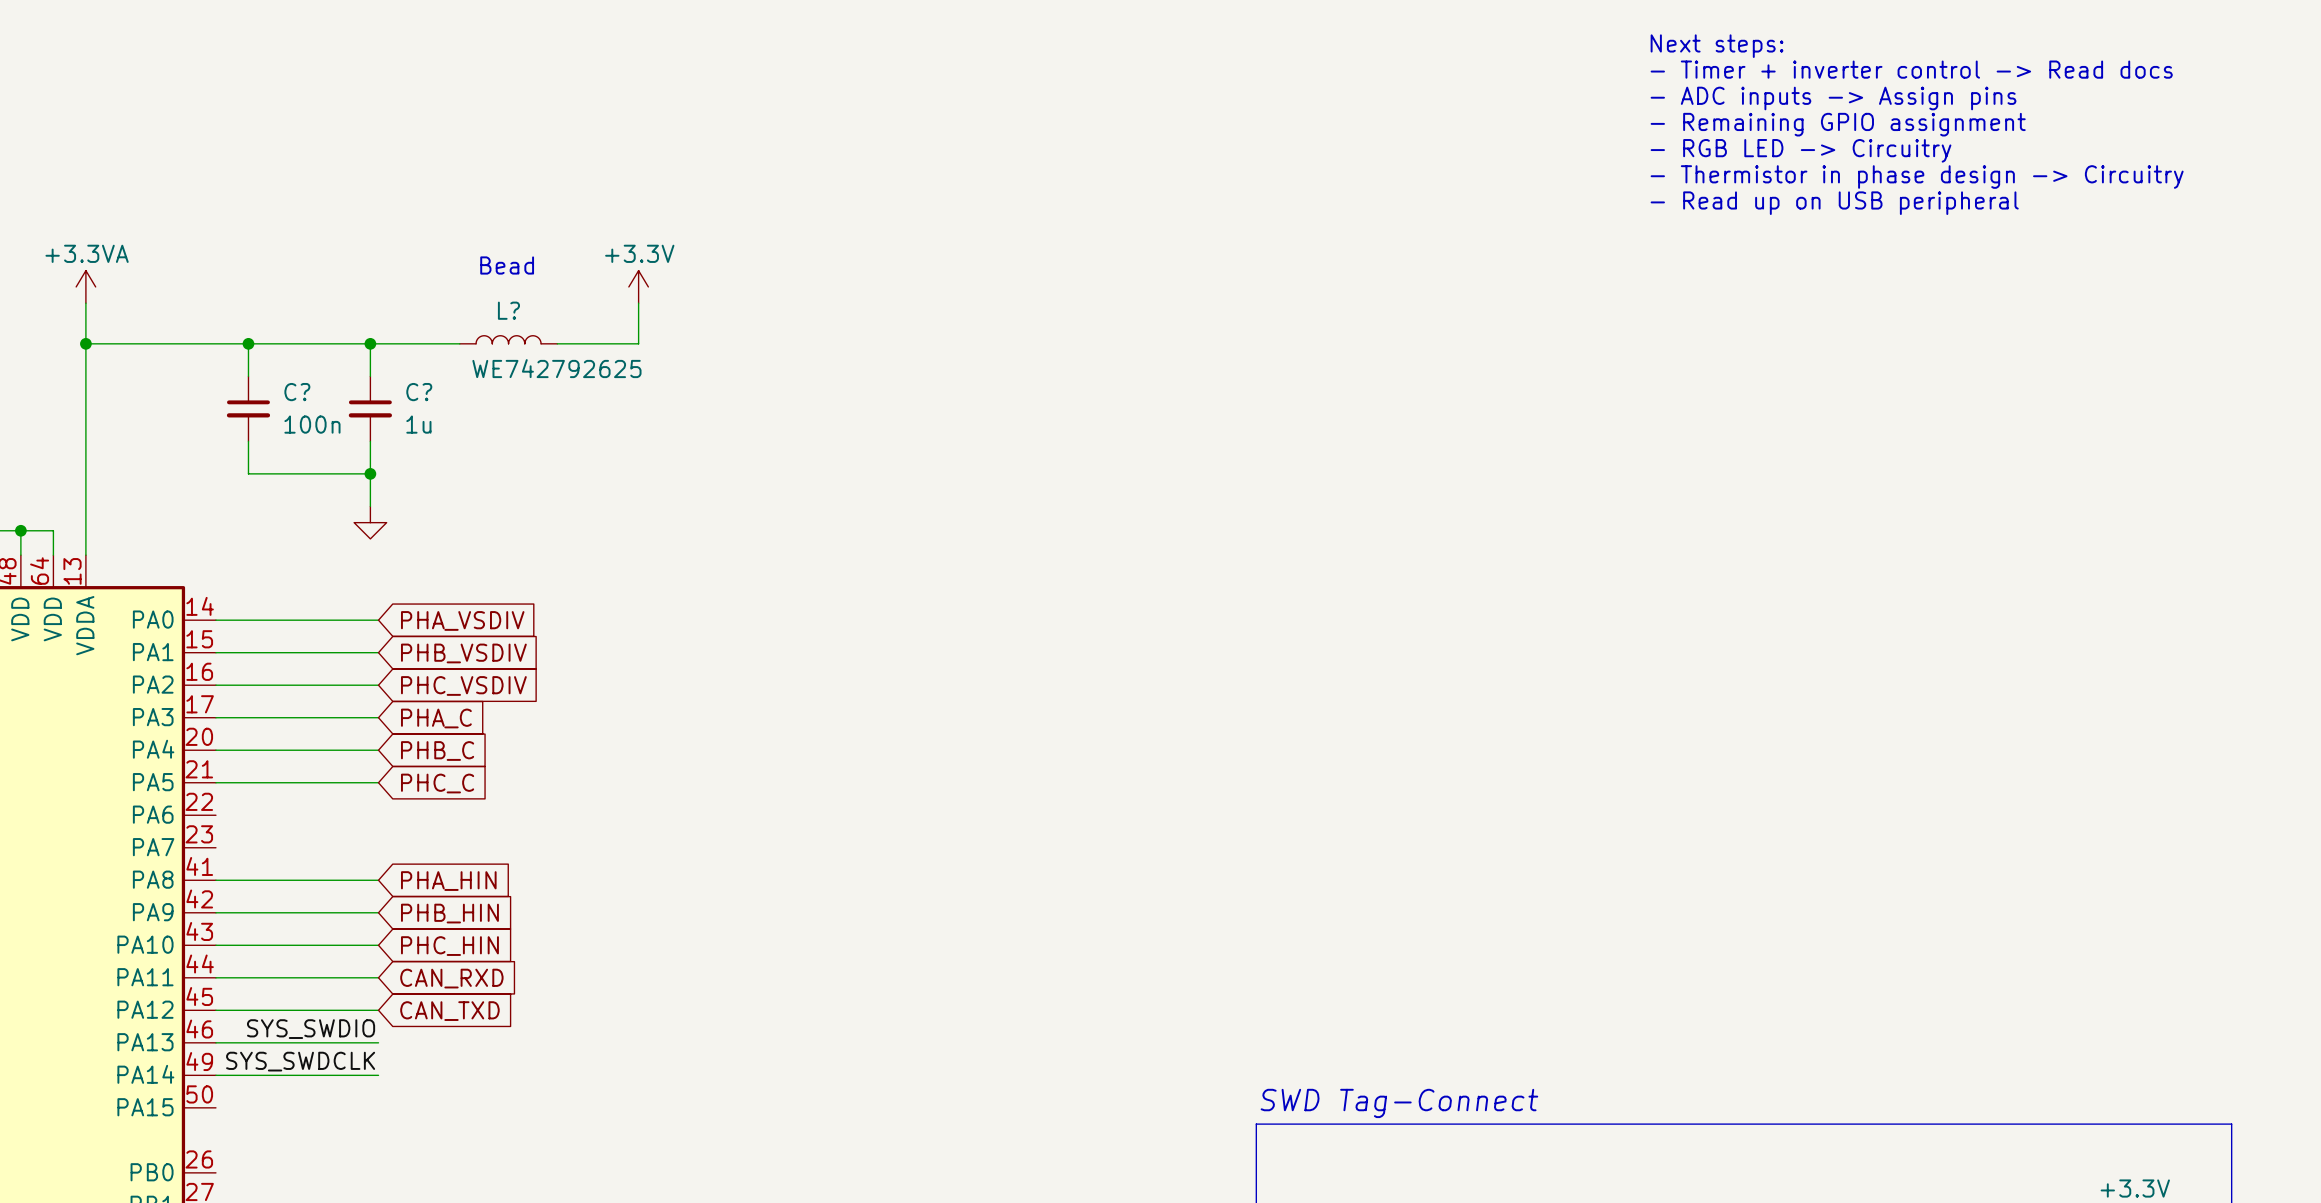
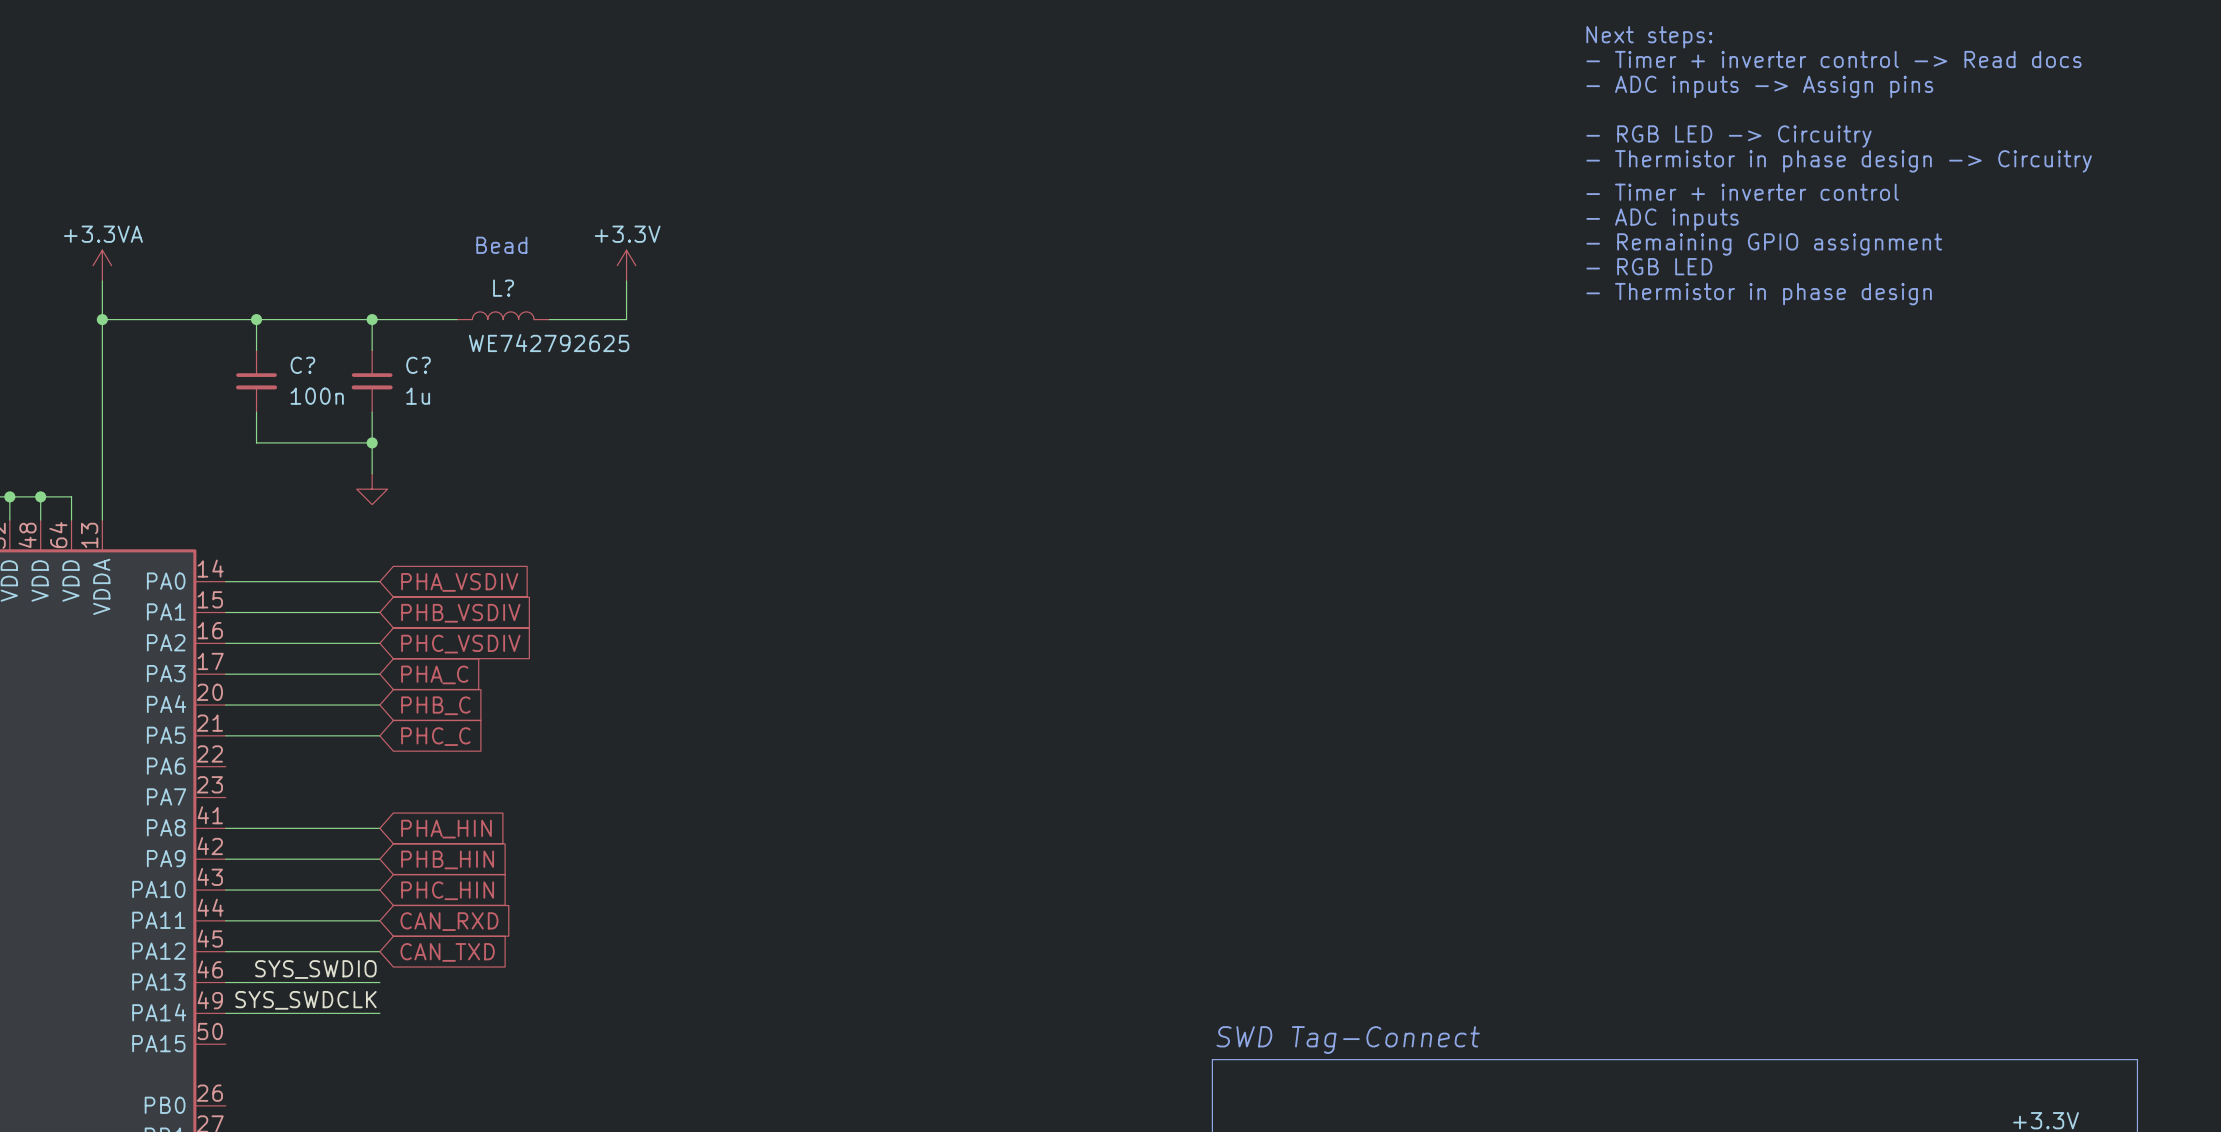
text position: - Remaining GPIO assignment (1838, 124) -> - Remaining GPIO assignment (1764, 244)
text: - Read up on USB peripheral (1834, 203) -> - Timer + inverter control (1742, 192)
text: none -> - ADC inputs (1662, 219)
text: none -> - RGB LED (1649, 266)
text: none -> - Thermistor in phase design (1759, 294)

